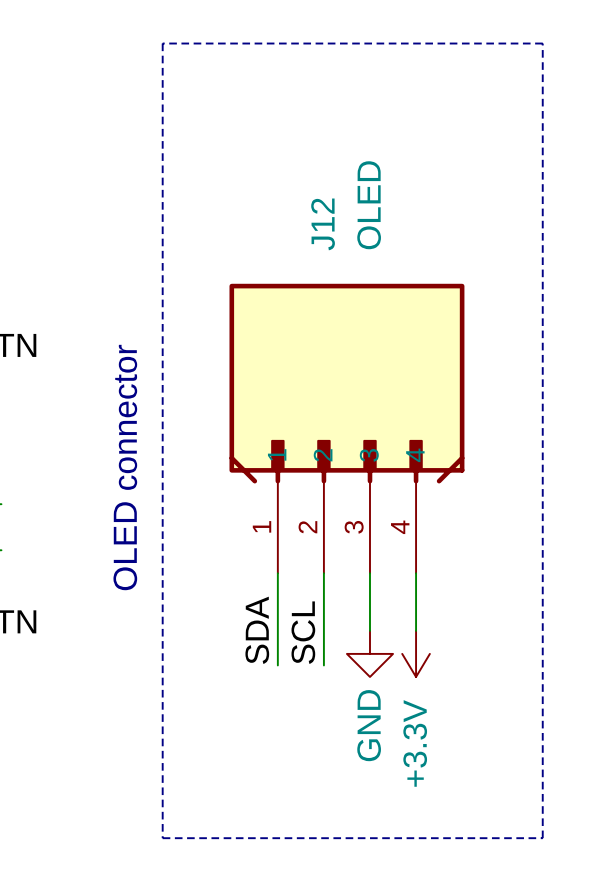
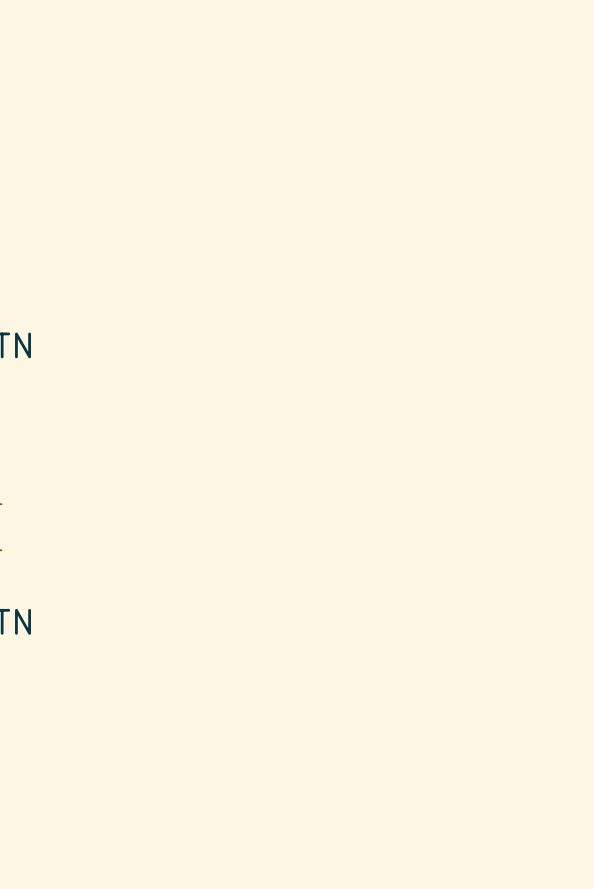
line: (162, 43) (542, 43) (542, 838) (162, 838) (162, 43) -> none
J12: OLED (346, 428) -> none
text: OLED connector (125, 467) -> none
wire: (277, 573) (277, 665) -> none
wire: (323, 573) (323, 665) -> none
wire: (369, 573) (369, 630) -> none
wire: (416, 573) (416, 630) -> none
label: SDA (257, 630) -> none
label: SCL (303, 632) -> none
power symbol: GND (369, 653) -> none
power symbol: +3.3V (416, 653) -> none

